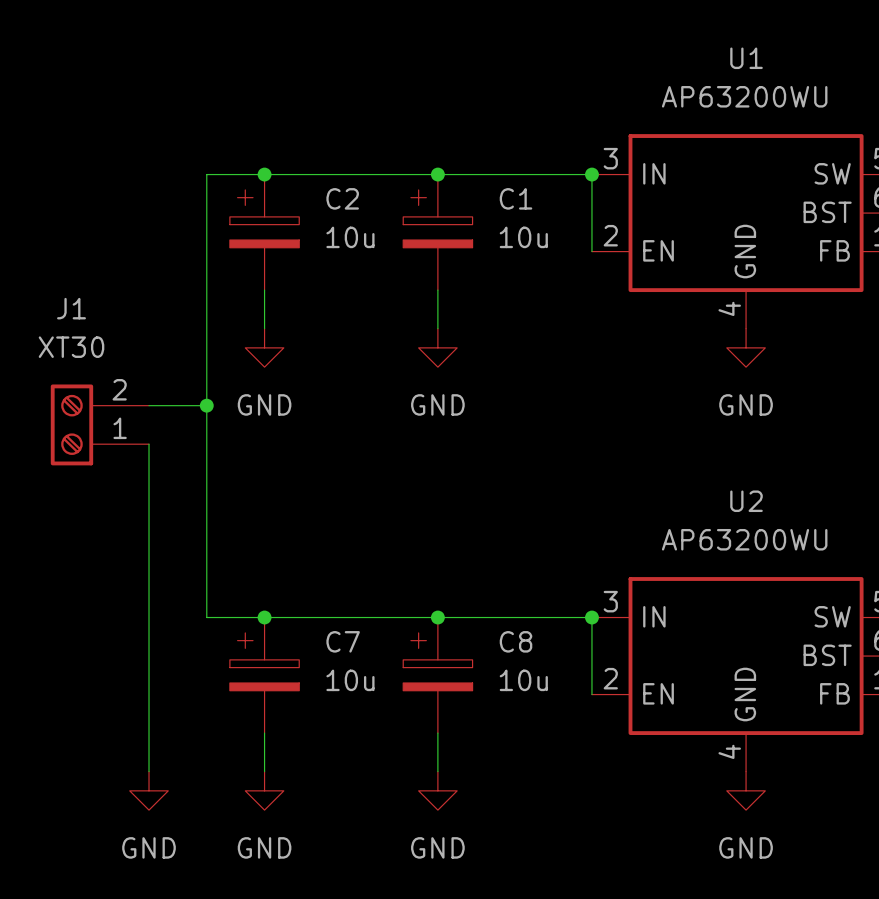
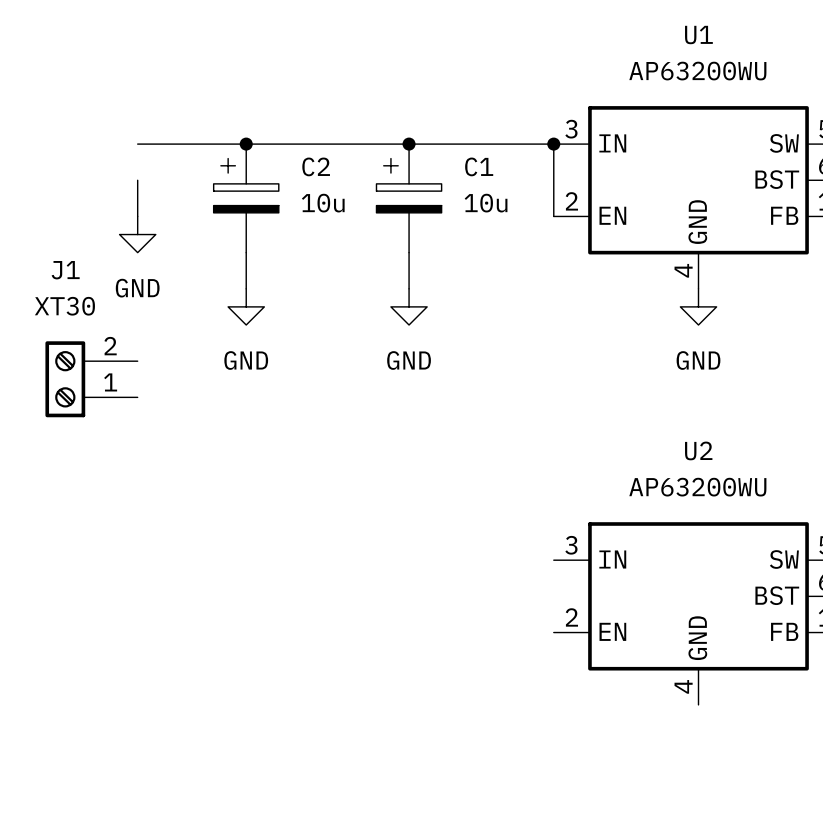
wire: (206, 174) (206, 617) (591, 617) (591, 694) -> (191, 144) (137, 144)
wire: none -> (137, 180) (137, 216)
power symbol: none -> GND (137, 234)
wire: (149, 405) (206, 405) -> none
junction: (206, 405) -> none
wire: (149, 444) (149, 771) -> none
junction: (264, 617) -> none
junction: (437, 617) -> none
junction: (591, 617) -> none
C7: 10u (264, 675) -> none
C8: 10u (437, 675) -> none
wire: (264, 733) (264, 771) -> none
wire: (437, 733) (437, 771) -> none
power symbol: GND (149, 790) -> none
power symbol: GND (264, 790) -> none
power symbol: GND (437, 790) -> none
power symbol: GND (746, 790) -> none

